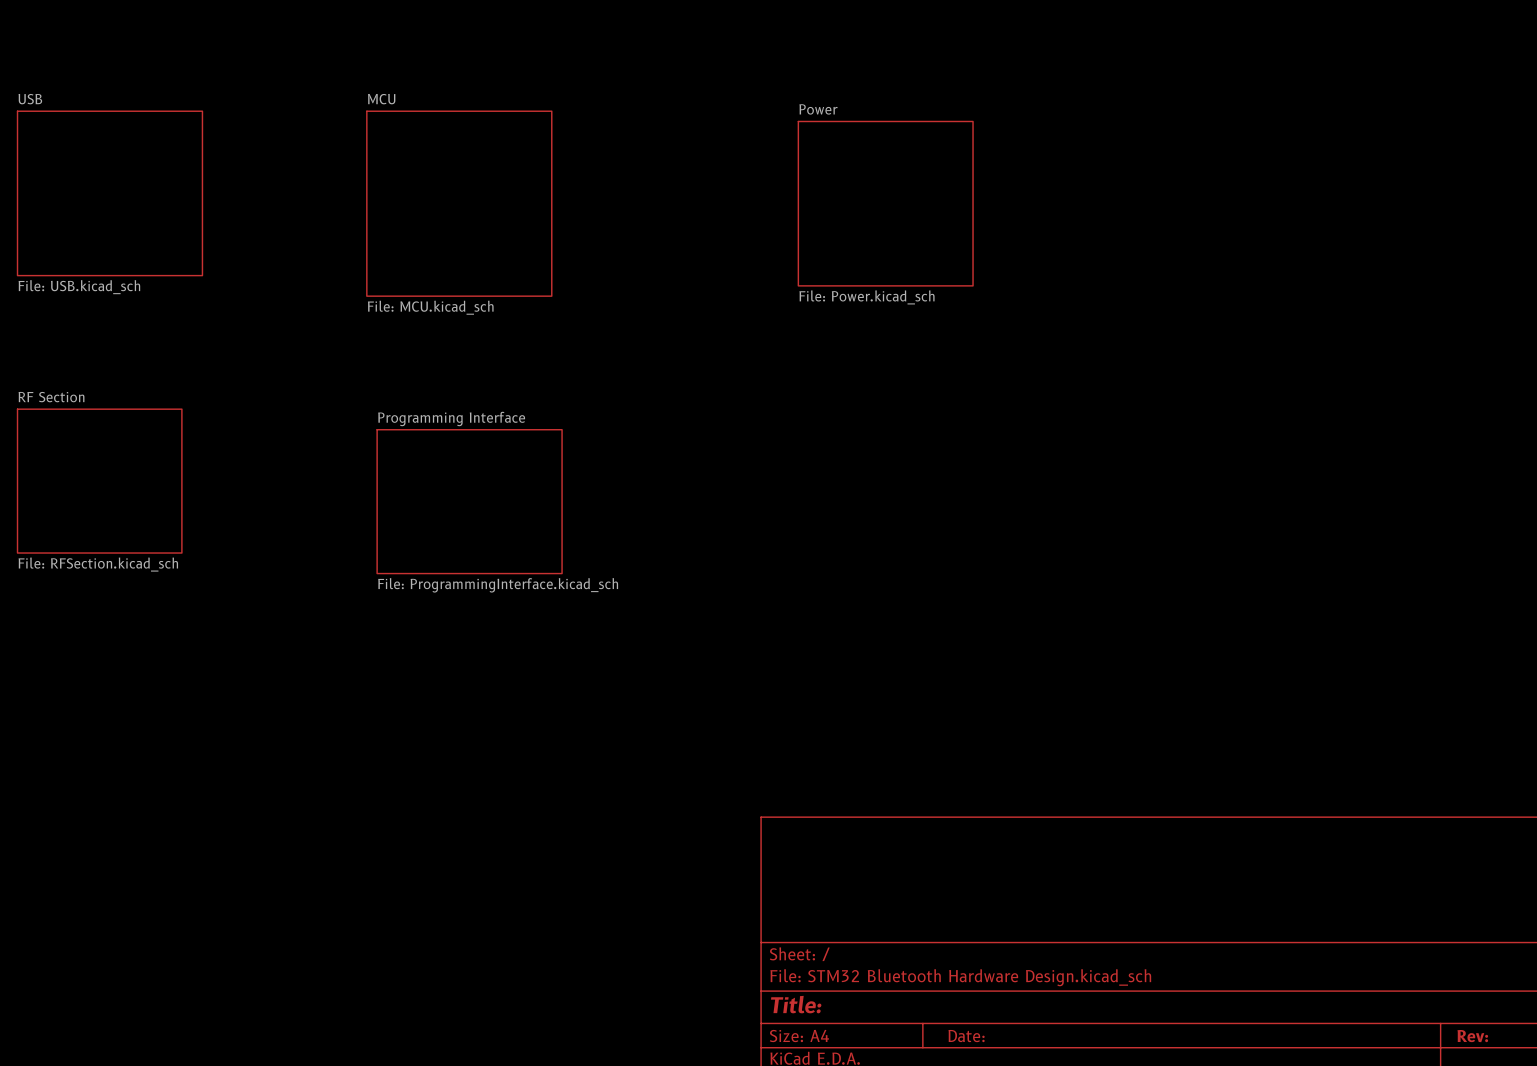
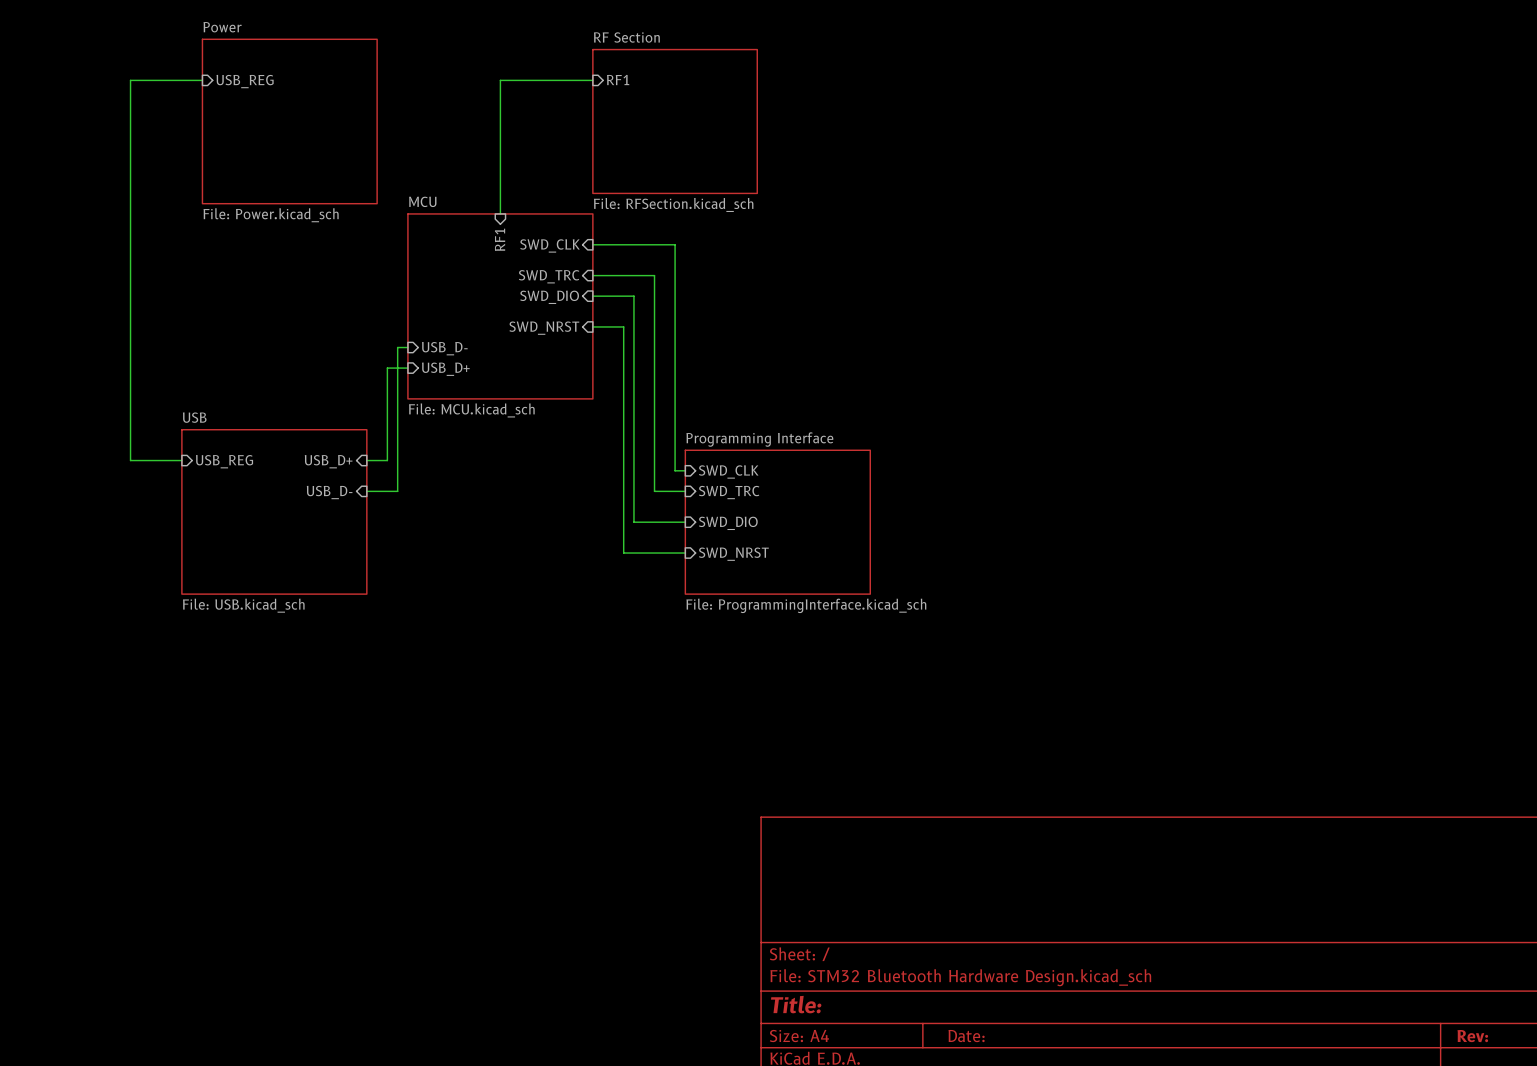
wire: none -> (202, 80) (130, 80) (130, 460) (181, 460)
wire: none -> (592, 80) (500, 80) (500, 213)
sheet pin: none -> RF1 (618, 80)
sheet pin: none -> USB_REG (245, 81)
sheet Power: none -> File: Power.kicad_sch (289, 121)
sheet RF Section: none -> File: RFSection.kicad_sch (675, 121)
sheet USB: File: USB.kicad_sch (109, 193) -> none
sheet MCU position: (459, 203) -> (500, 306)
sheet Power: File: Power.kicad_sch (885, 203) -> none
sheet pin: none -> RF1 (500, 239)
wire: none -> (592, 244) (675, 244) (675, 470) (685, 470)
sheet pin: none -> SWD_CLK (549, 245)
wire: none -> (592, 275) (654, 275) (654, 491) (685, 491)
sheet pin: none -> SWD_TRC (549, 276)
wire: none -> (592, 296) (633, 296) (633, 522) (685, 522)
sheet pin: none -> SWD_DIO (549, 297)
wire: none -> (592, 326) (623, 326) (623, 553) (685, 553)
sheet pin: none -> SWD_NRST (544, 328)
wire: none -> (407, 347) (397, 347) (397, 491) (366, 491)
sheet pin: none -> USB_D- (444, 348)
wire: none -> (407, 368) (387, 368) (387, 460) (366, 460)
sheet pin: none -> USB_D+ (445, 369)
sheet pin: none -> USB_REG (224, 461)
sheet pin: none -> USB_D+ (328, 461)
sheet pin: none -> SWD_CLK (728, 471)
sheet RF Section: File: RFSection.kicad_sch (99, 481) -> none
sheet pin: none -> USB_D- (329, 492)
sheet pin: none -> SWD_TRC (729, 492)
sheet Programming Interface: File: ProgrammingInterface.kicad_sch (469, 501) -> none
sheet USB: none -> File: USB.kicad_sch (274, 511)
sheet Programming Interface: none -> File: ProgrammingInterface.kicad_sch (777, 522)
sheet pin: none -> SWD_DIO (728, 523)
sheet pin: none -> SWD_NRST (733, 554)

